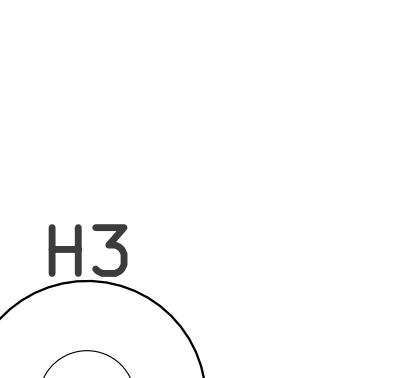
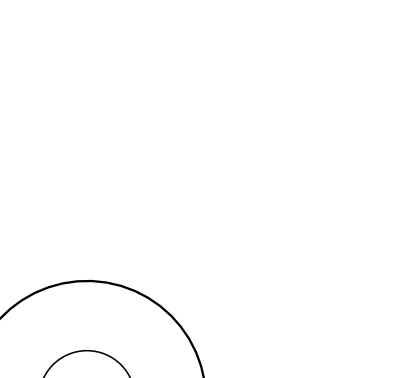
H3 name: H3 (88, 250) -> none

